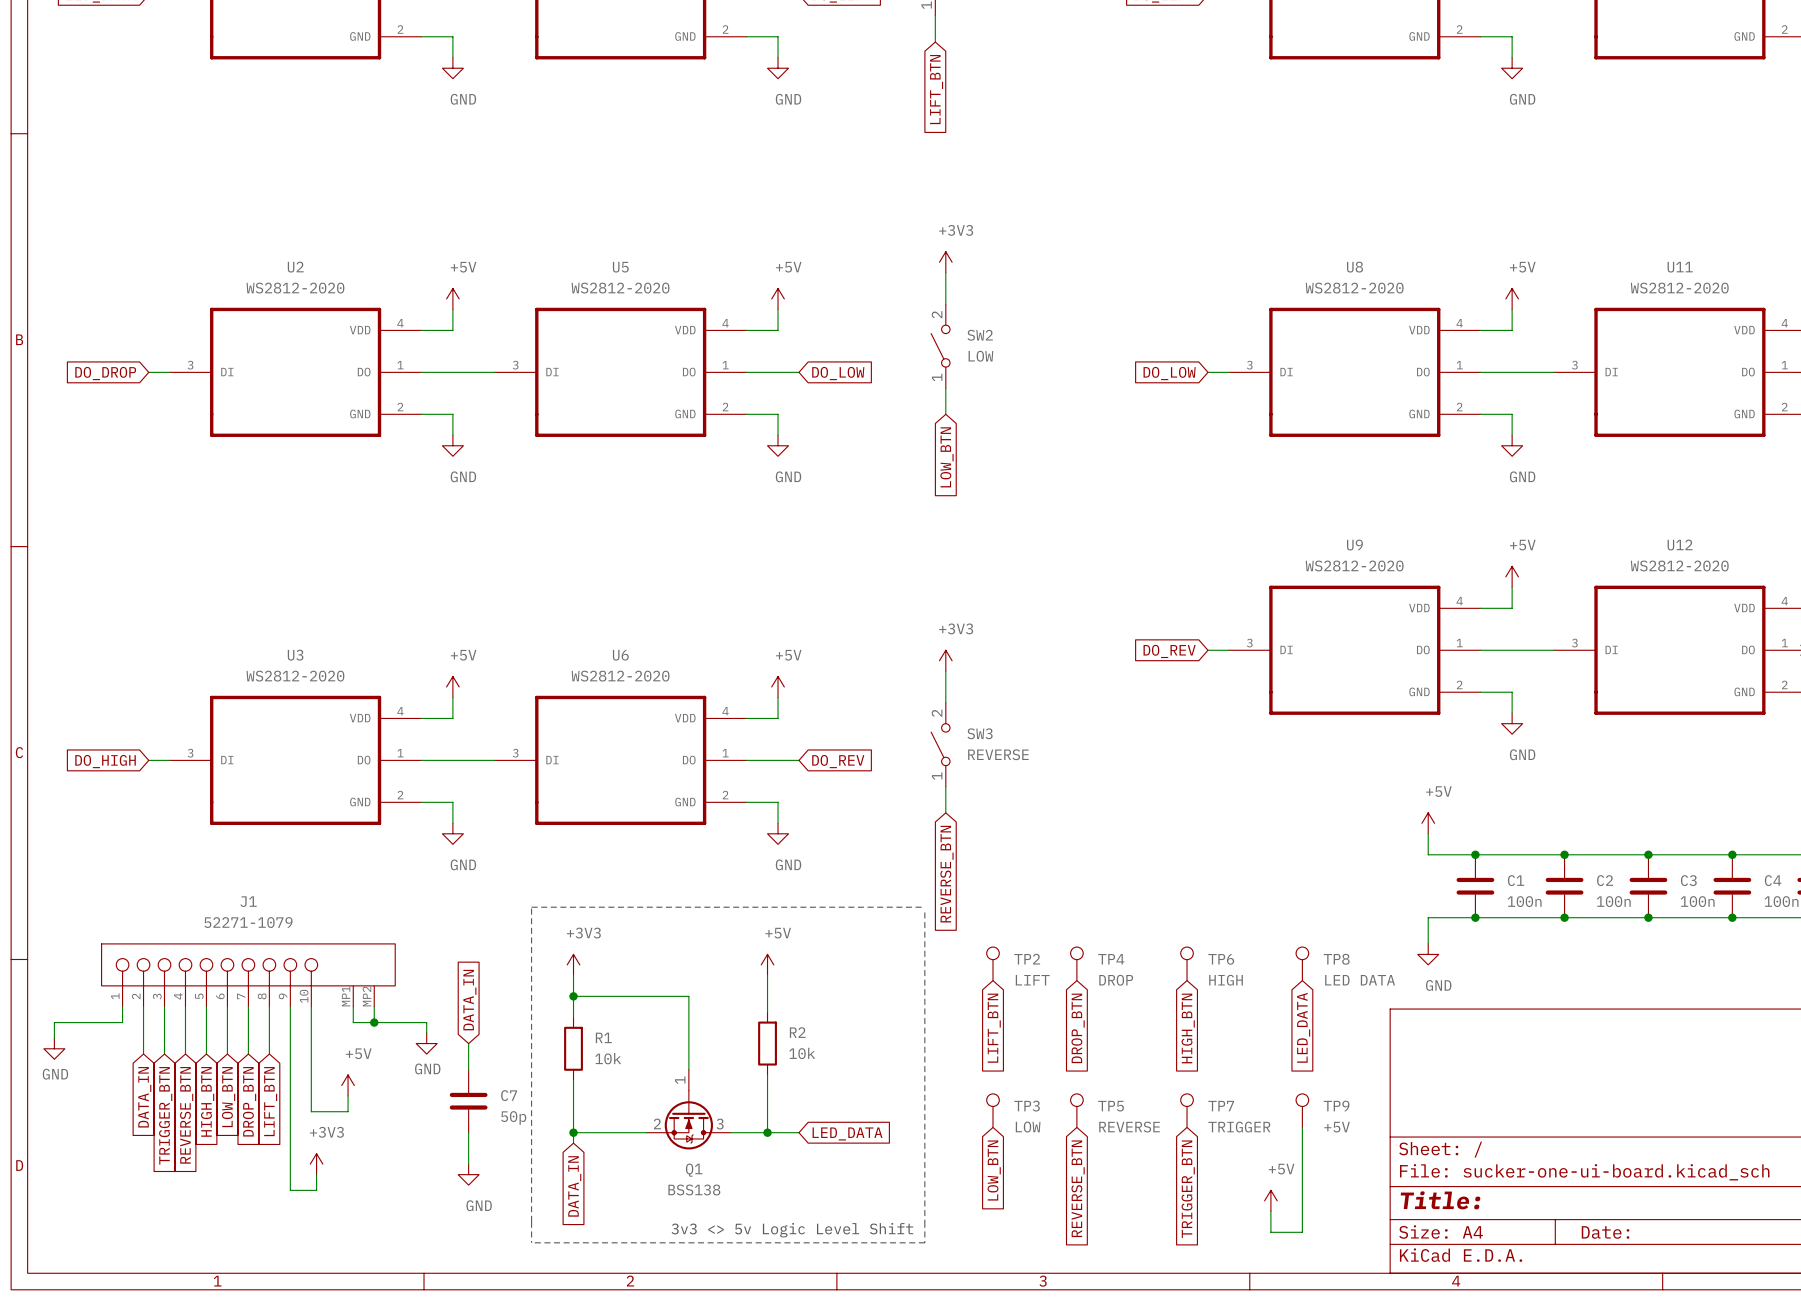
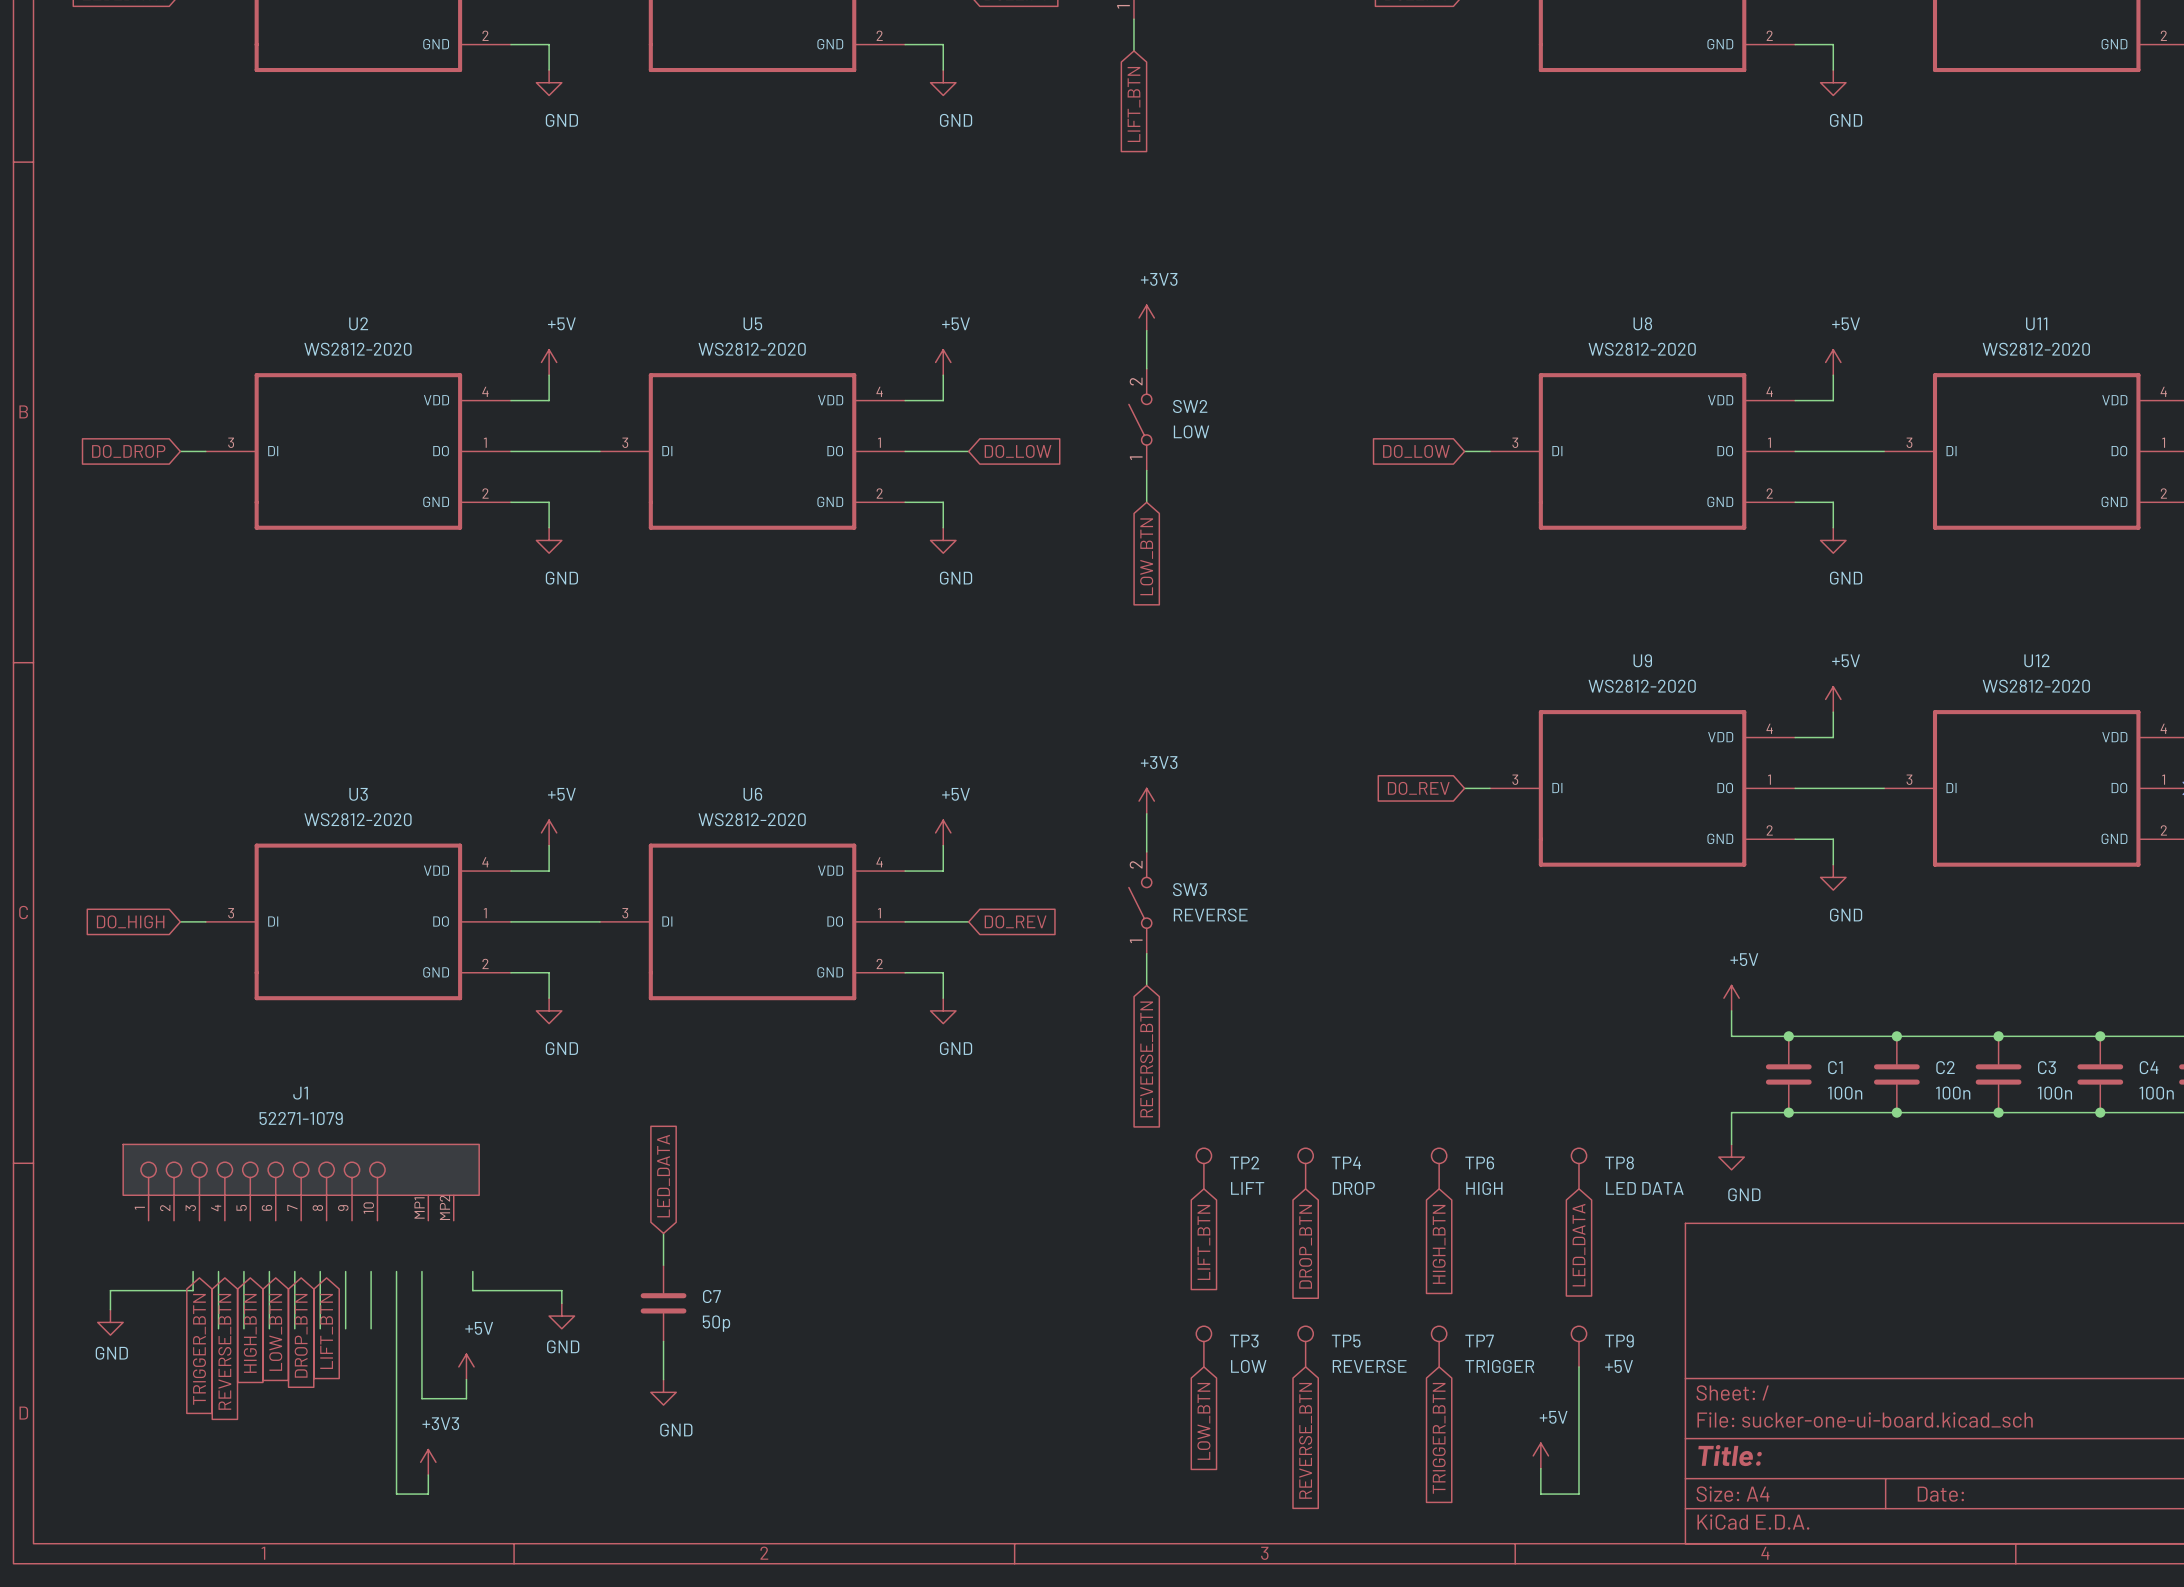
line: (924, 907) (531, 907) (531, 1242) (924, 1242) (924, 912) -> none
power symbol: +3V3 (573, 964) -> none
power symbol: +5V (767, 964) -> none
global label: none -> LED_DATA (663, 1176)
wire: (573, 975) (573, 1017) -> none
wire: (767, 975) (767, 1012) -> none
wire: (573, 996) (688, 996) (688, 1069) -> none
junction: (573, 996) -> none
global label: DATA_IN (469, 1000) -> none
wire: (122, 1006) (122, 1022) (54, 1022) (54, 1038) -> (193, 1271) (193, 1290) (110, 1290) (110, 1309)
wire: (143, 1006) (143, 1054) -> (218, 1271) (218, 1328)
wire: (164, 1006) (164, 1054) -> (243, 1271) (243, 1328)
wire: (185, 1006) (185, 1054) -> (269, 1271) (269, 1328)
wire: (206, 1006) (206, 1054) -> (294, 1271) (294, 1328)
wire: (227, 1006) (227, 1054) -> (320, 1271) (320, 1328)
wire: (248, 1006) (248, 1054) -> (345, 1271) (345, 1328)
wire: (269, 1006) (269, 1054) -> (371, 1271) (371, 1328)
wire: (290, 1006) (290, 1190) (316, 1190) (316, 1174) -> (396, 1271) (396, 1494) (428, 1494) (428, 1474)
wire: (311, 1006) (311, 1111) (348, 1111) -> (466, 1379) (466, 1398) (421, 1398) (421, 1347)
wire: (353, 1006) (353, 1022) (426, 1022) (426, 1033) -> (472, 1271) (472, 1290) (561, 1290) (561, 1303)
wire: (374, 1006) (374, 1022) -> none
junction: (374, 1022) -> none
power symbol: GND (426, 1043) -> none
wire: (468, 1043) (468, 1069) -> (663, 1233) (663, 1265)
R2: 10k (767, 1043) -> none
power symbol position: GND (54, 1048) -> GND (110, 1322)
wire: none -> (421, 1271) (421, 1328)
R1: 10k (573, 1048) -> none
wire: (767, 1075) (767, 1132) -> none
wire: (573, 1080) (573, 1143) -> none
power symbol position: +5V (348, 1085) -> +5V (466, 1366)
power symbol: none -> GND (561, 1316)
global label: DATA_IN (144, 1097) -> none
C7 position: (468, 1101) -> (663, 1303)
Q1: BSS138 (688, 1109) -> none
wire: (468, 1132) (468, 1164) -> (663, 1341) (663, 1379)
wire: (573, 1132) (646, 1132) -> none
junction: (573, 1132) -> none
wire: (730, 1132) (798, 1132) -> none
junction: (767, 1132) -> none
global label: LED_DATA (847, 1133) -> none
power symbol: none -> GND (663, 1392)
power symbol position: +3V3 (316, 1164) -> +3V3 (428, 1462)
power symbol: GND (468, 1174) -> none
global label: DATA_IN (574, 1186) -> none
text: 3v3 <> 5v Logic Level Shift (792, 1230) -> none

